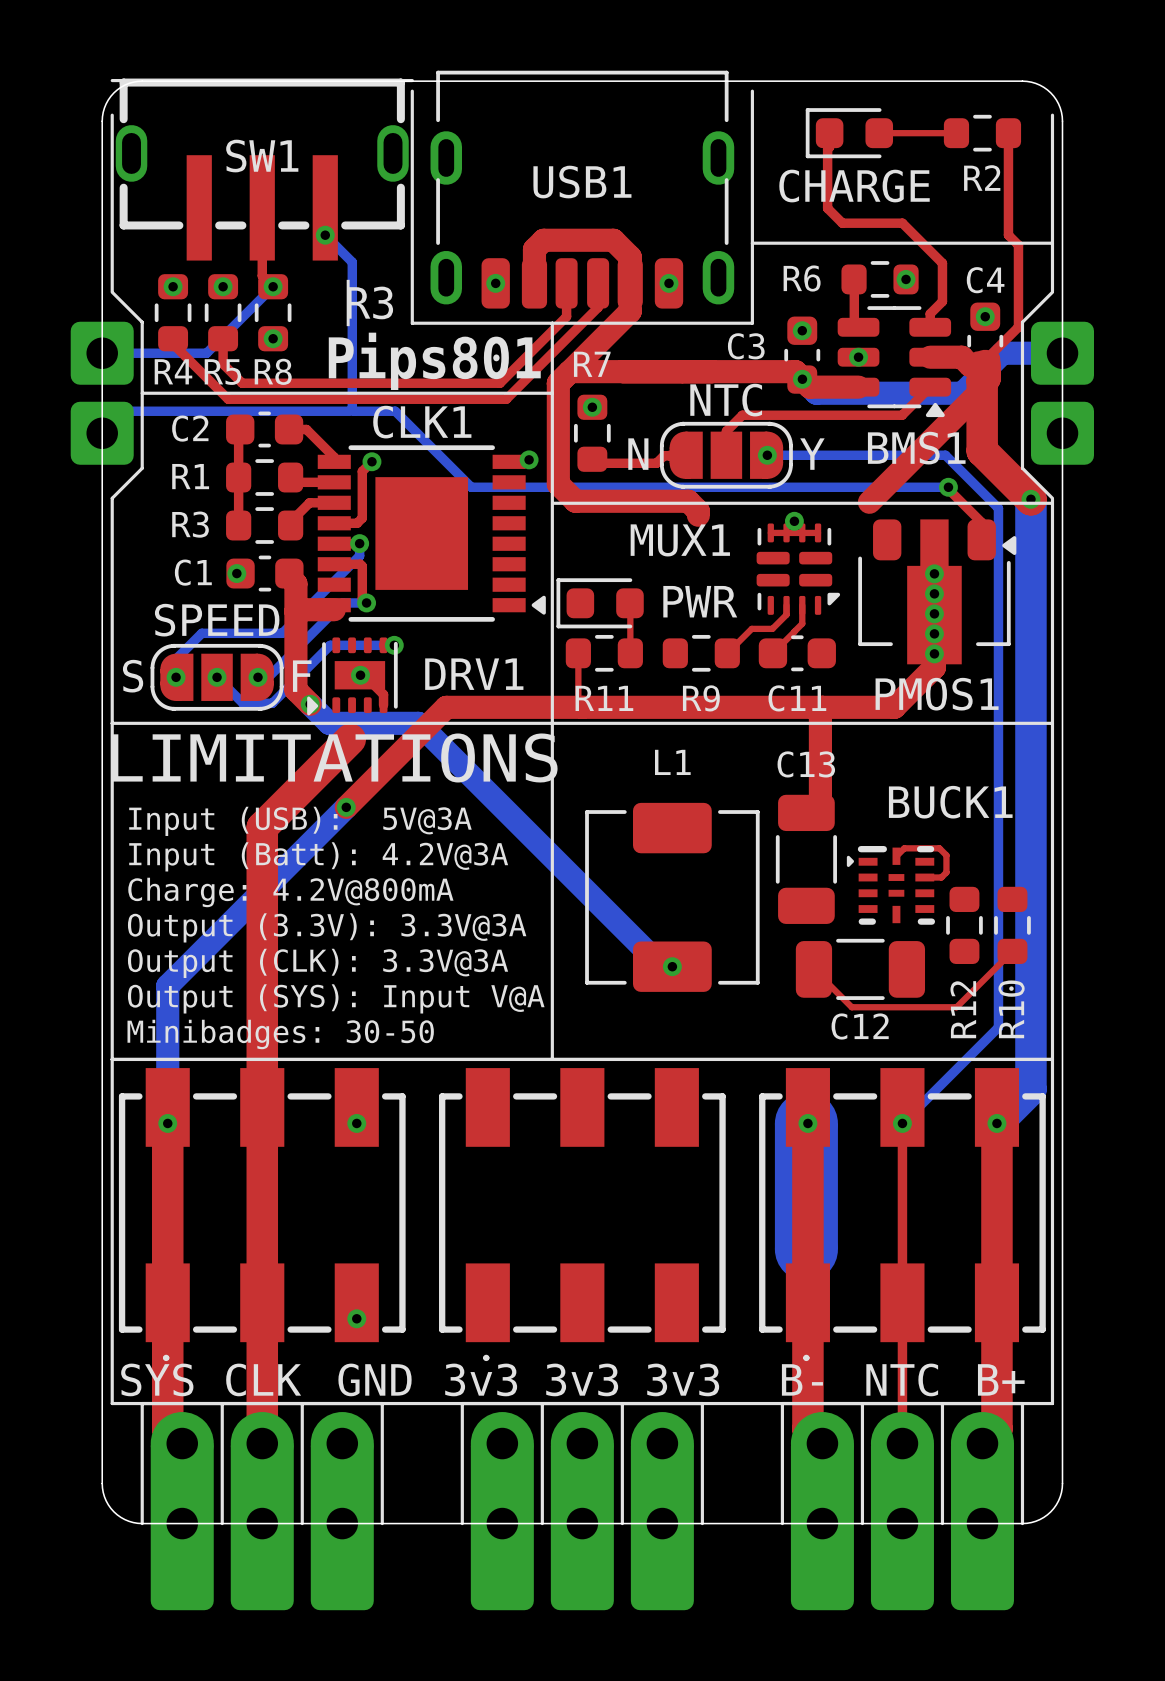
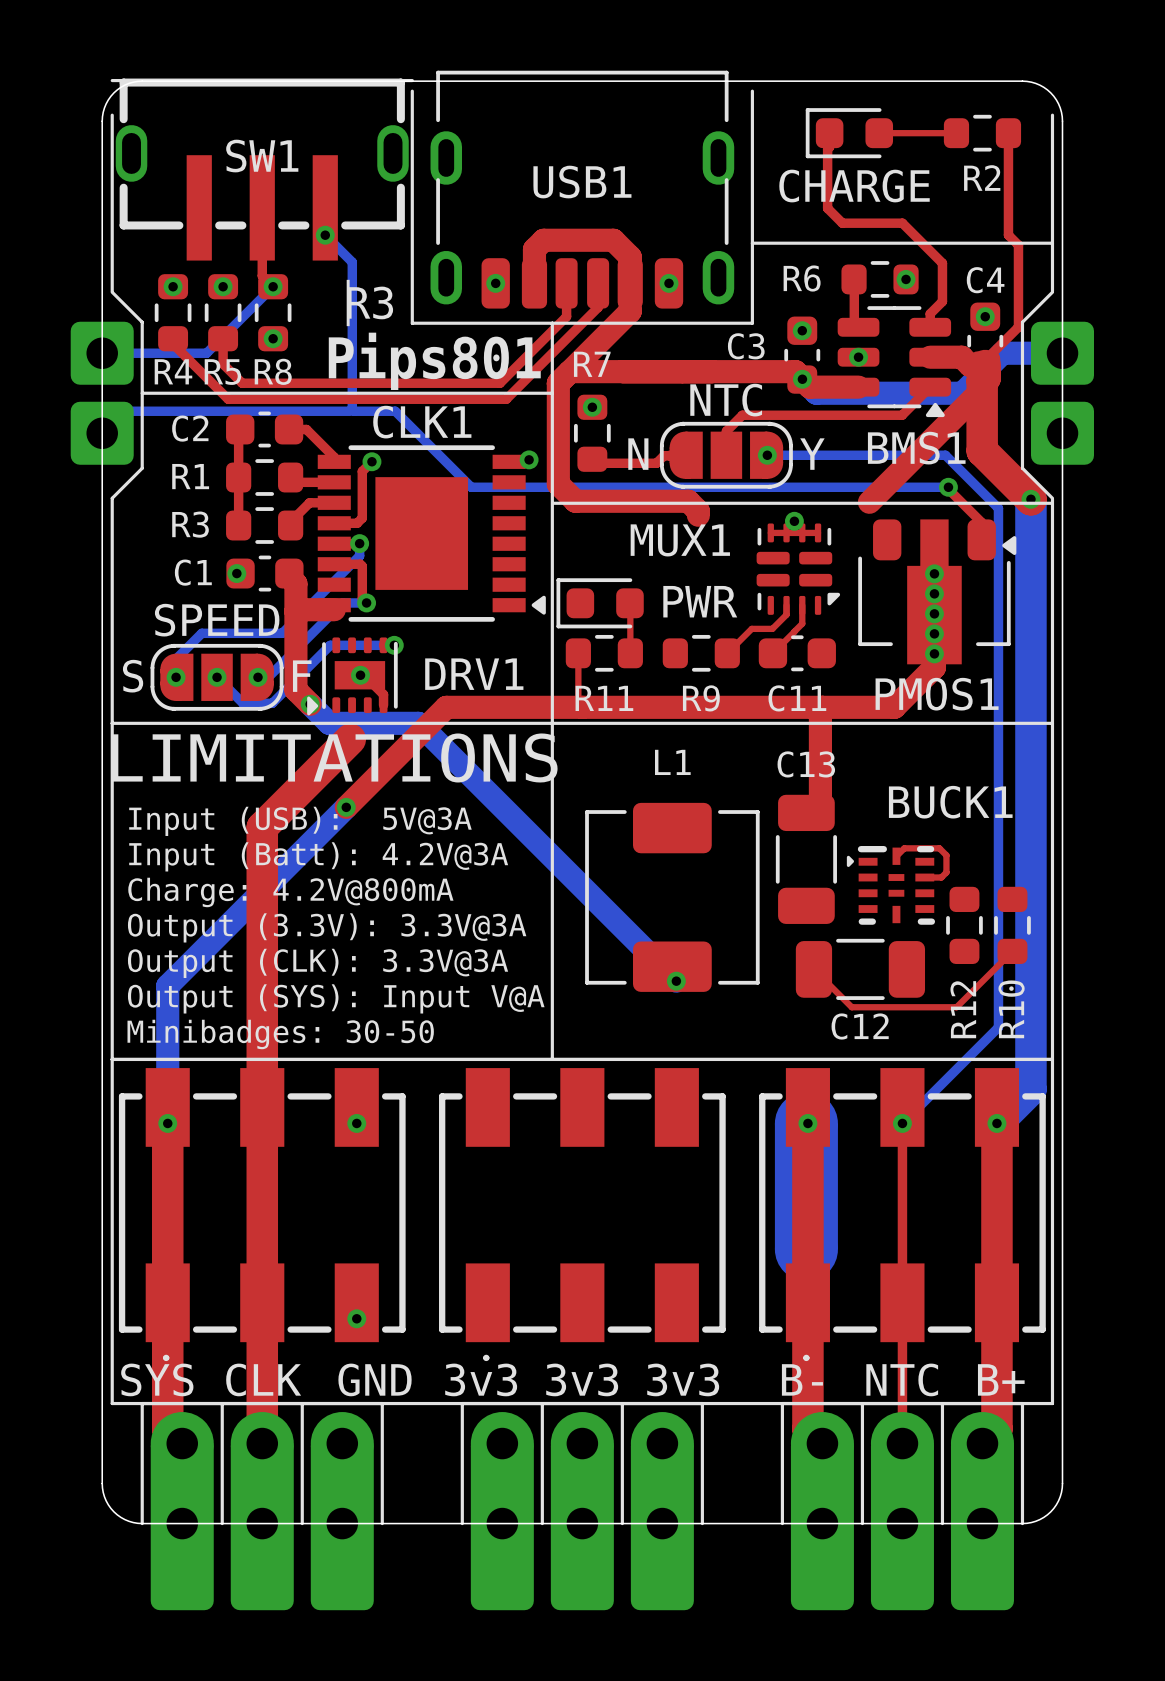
via position: (672, 966) -> (676, 981)

